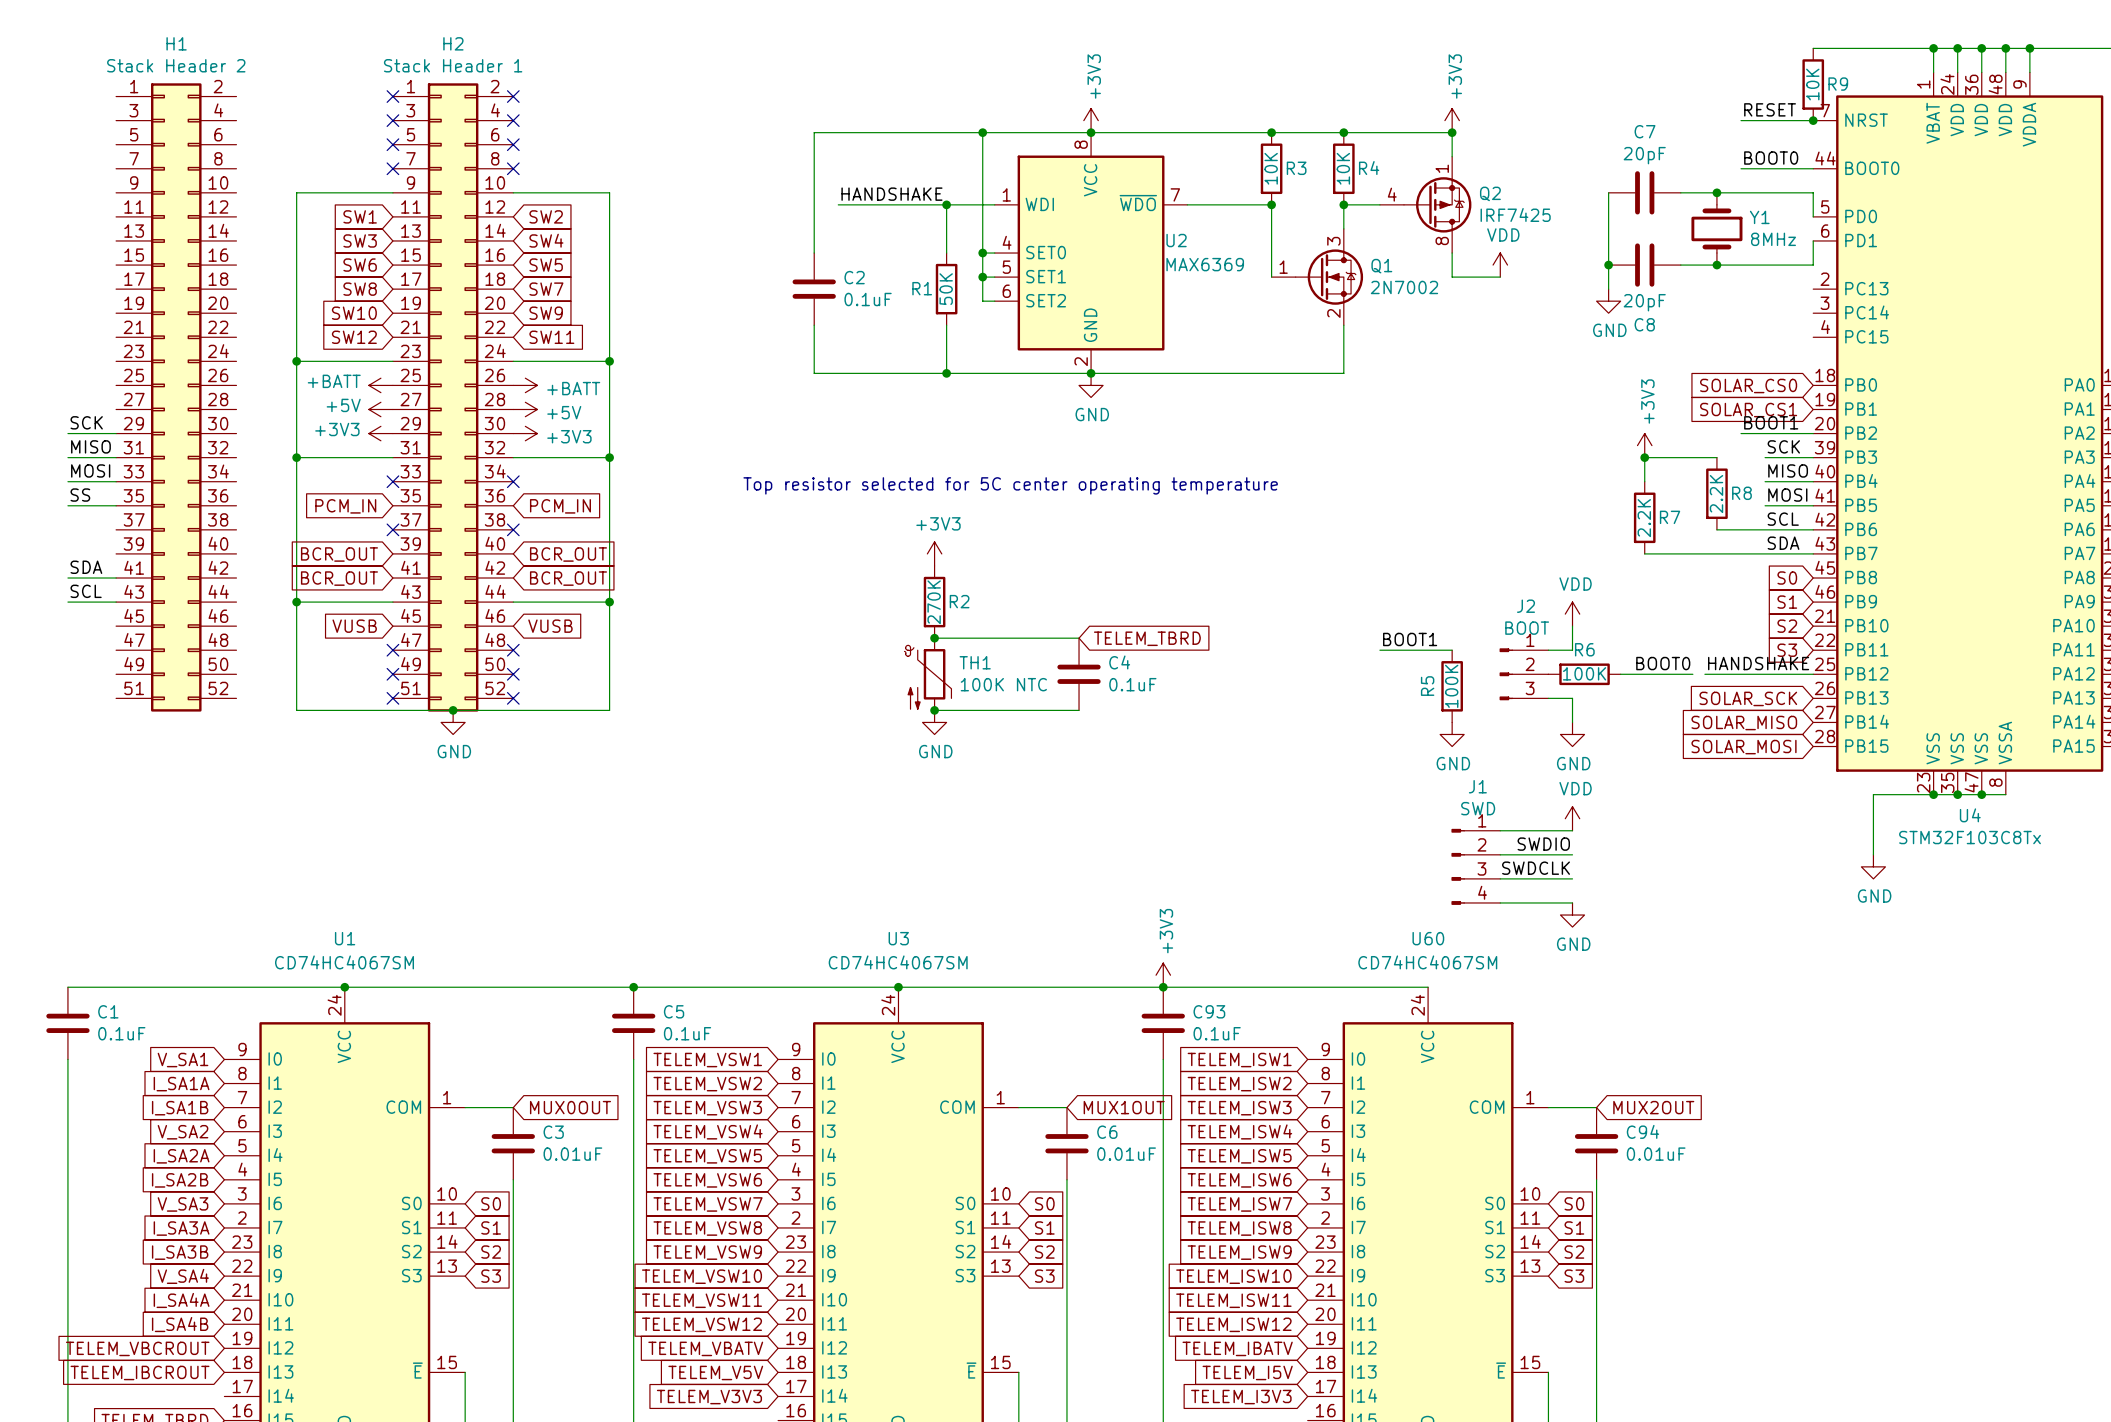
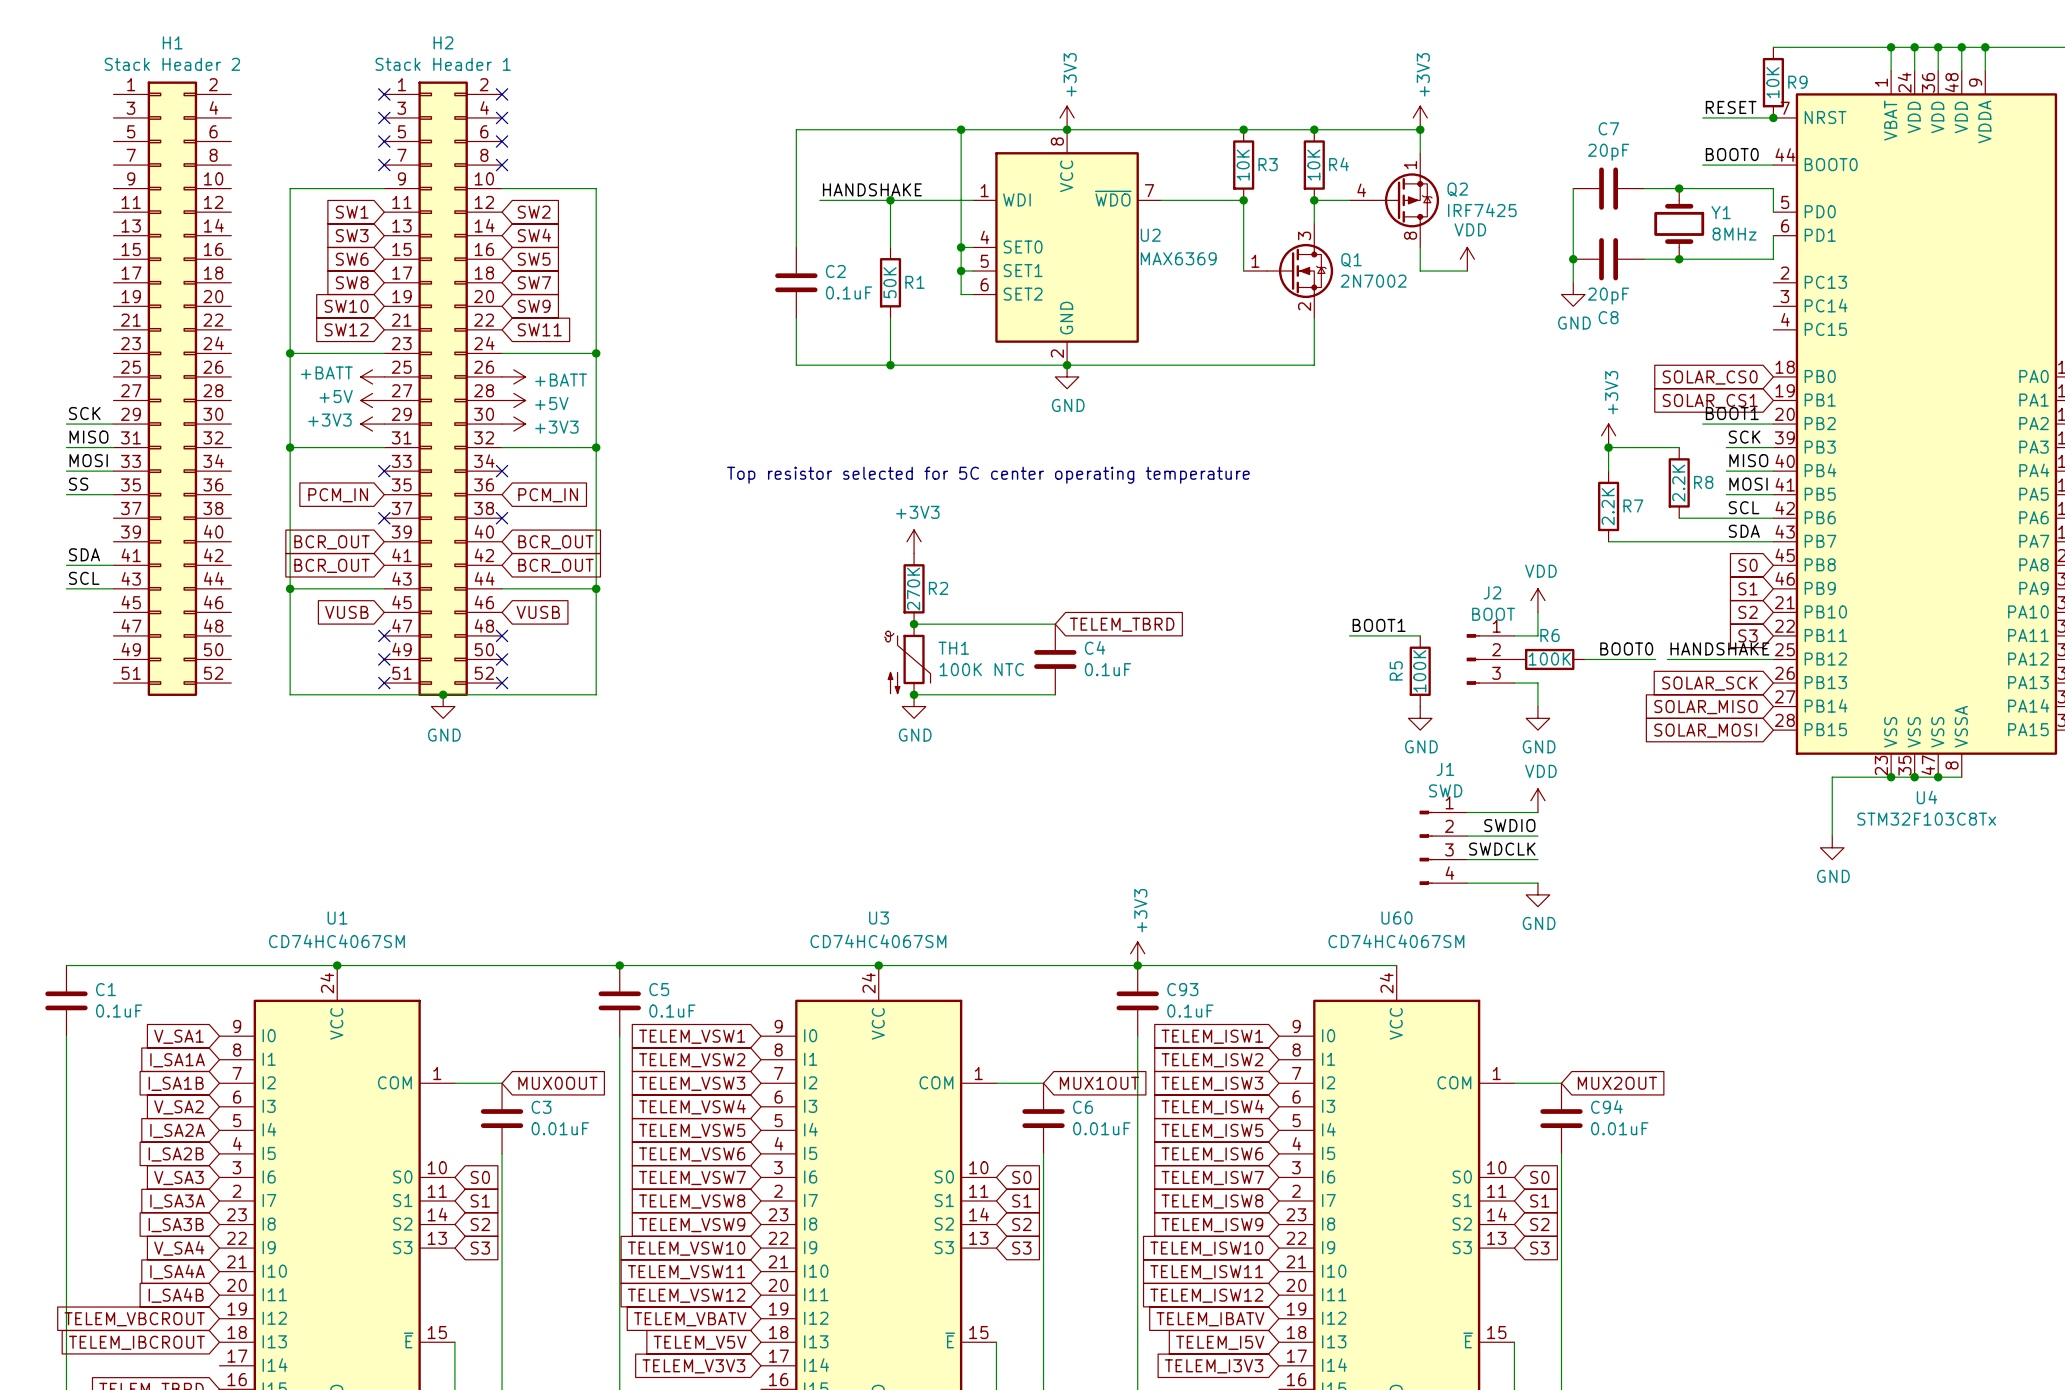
wire: (946, 204) (946, 253) -> (890, 200) (890, 247)
junction position: (946, 204) -> (890, 200)
R1 name position: R1 (922, 288) -> R1 (914, 282)
R1 position: (946, 289) -> (890, 282)
wire: (946, 325) (946, 373) -> (890, 318) (890, 365)
junction position: (946, 373) -> (890, 365)

